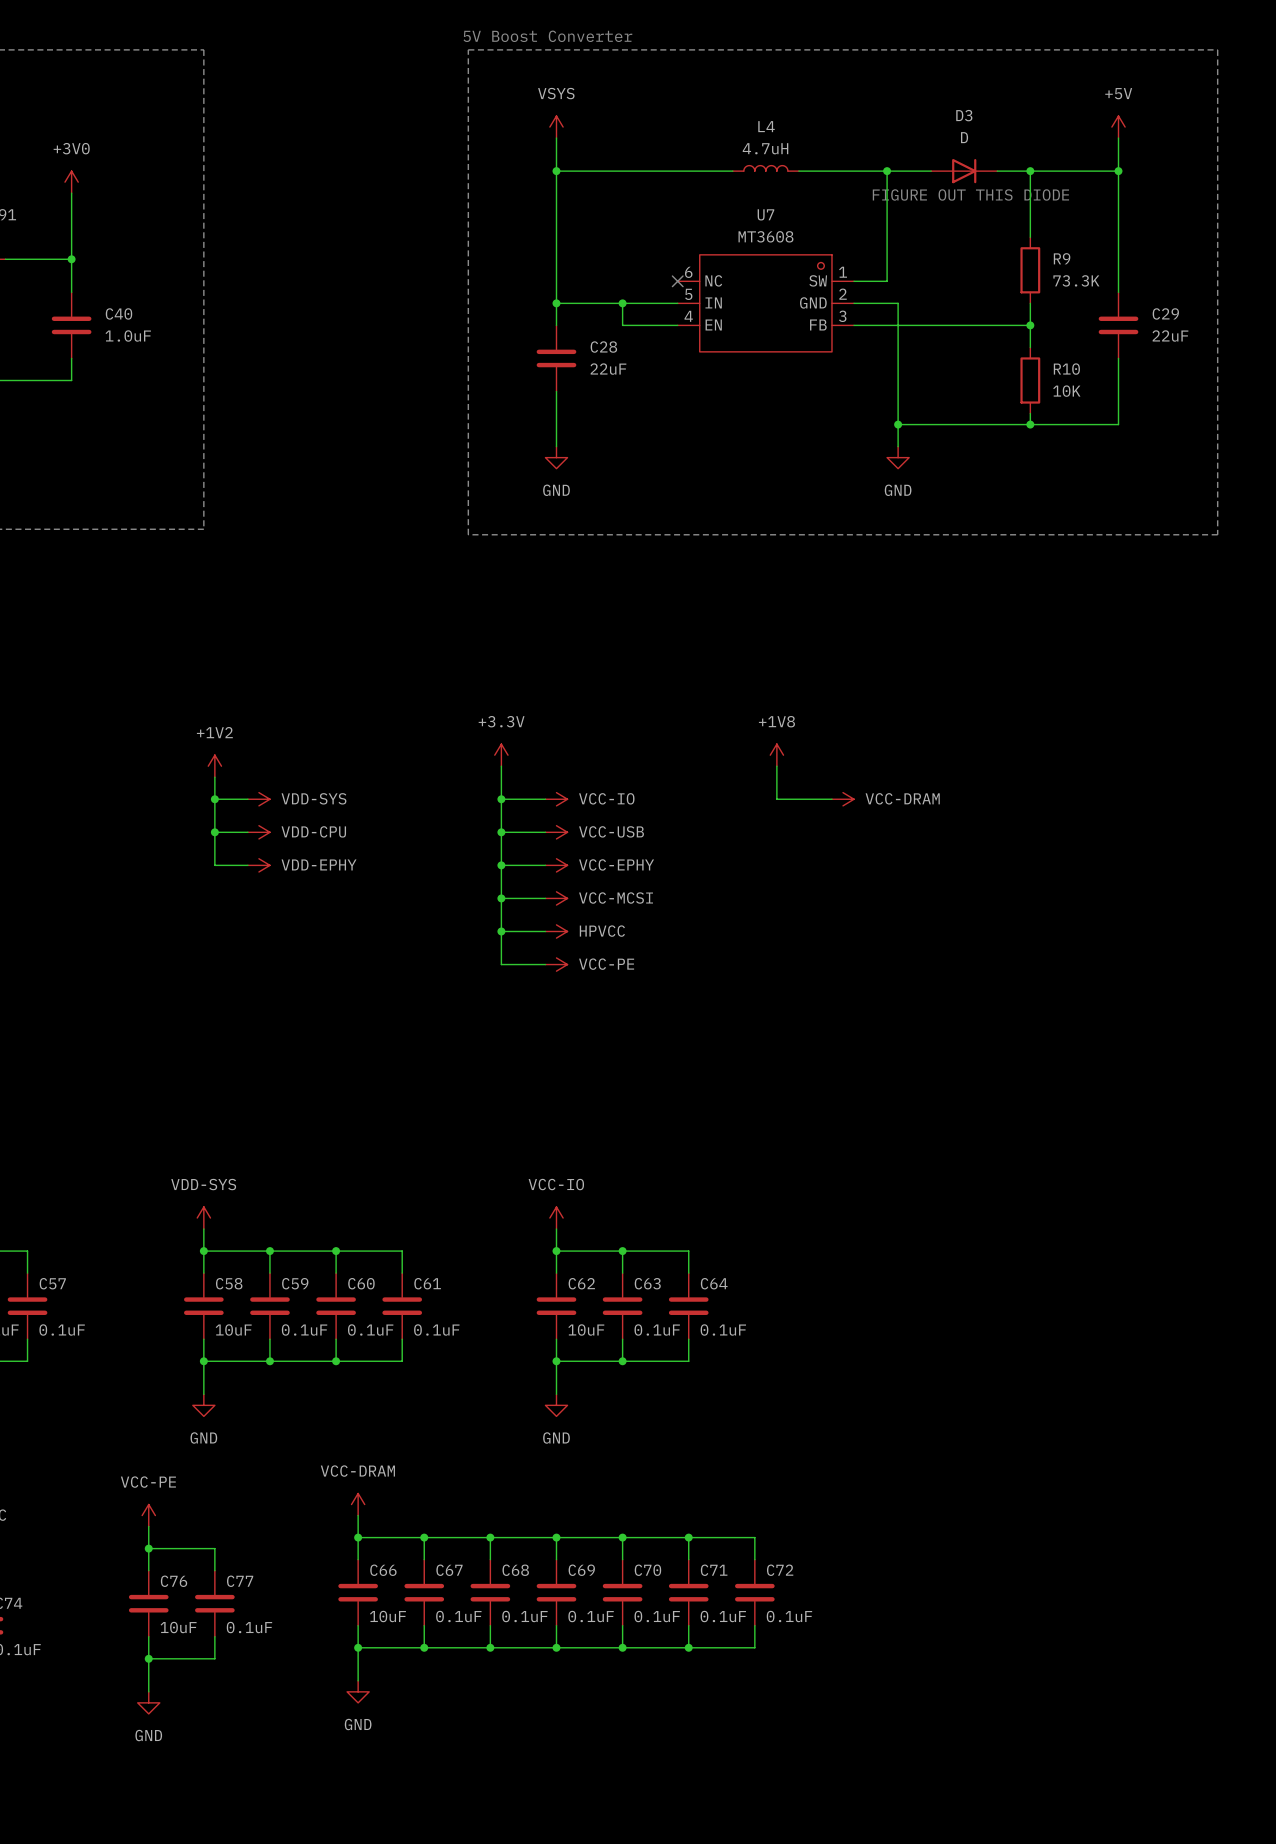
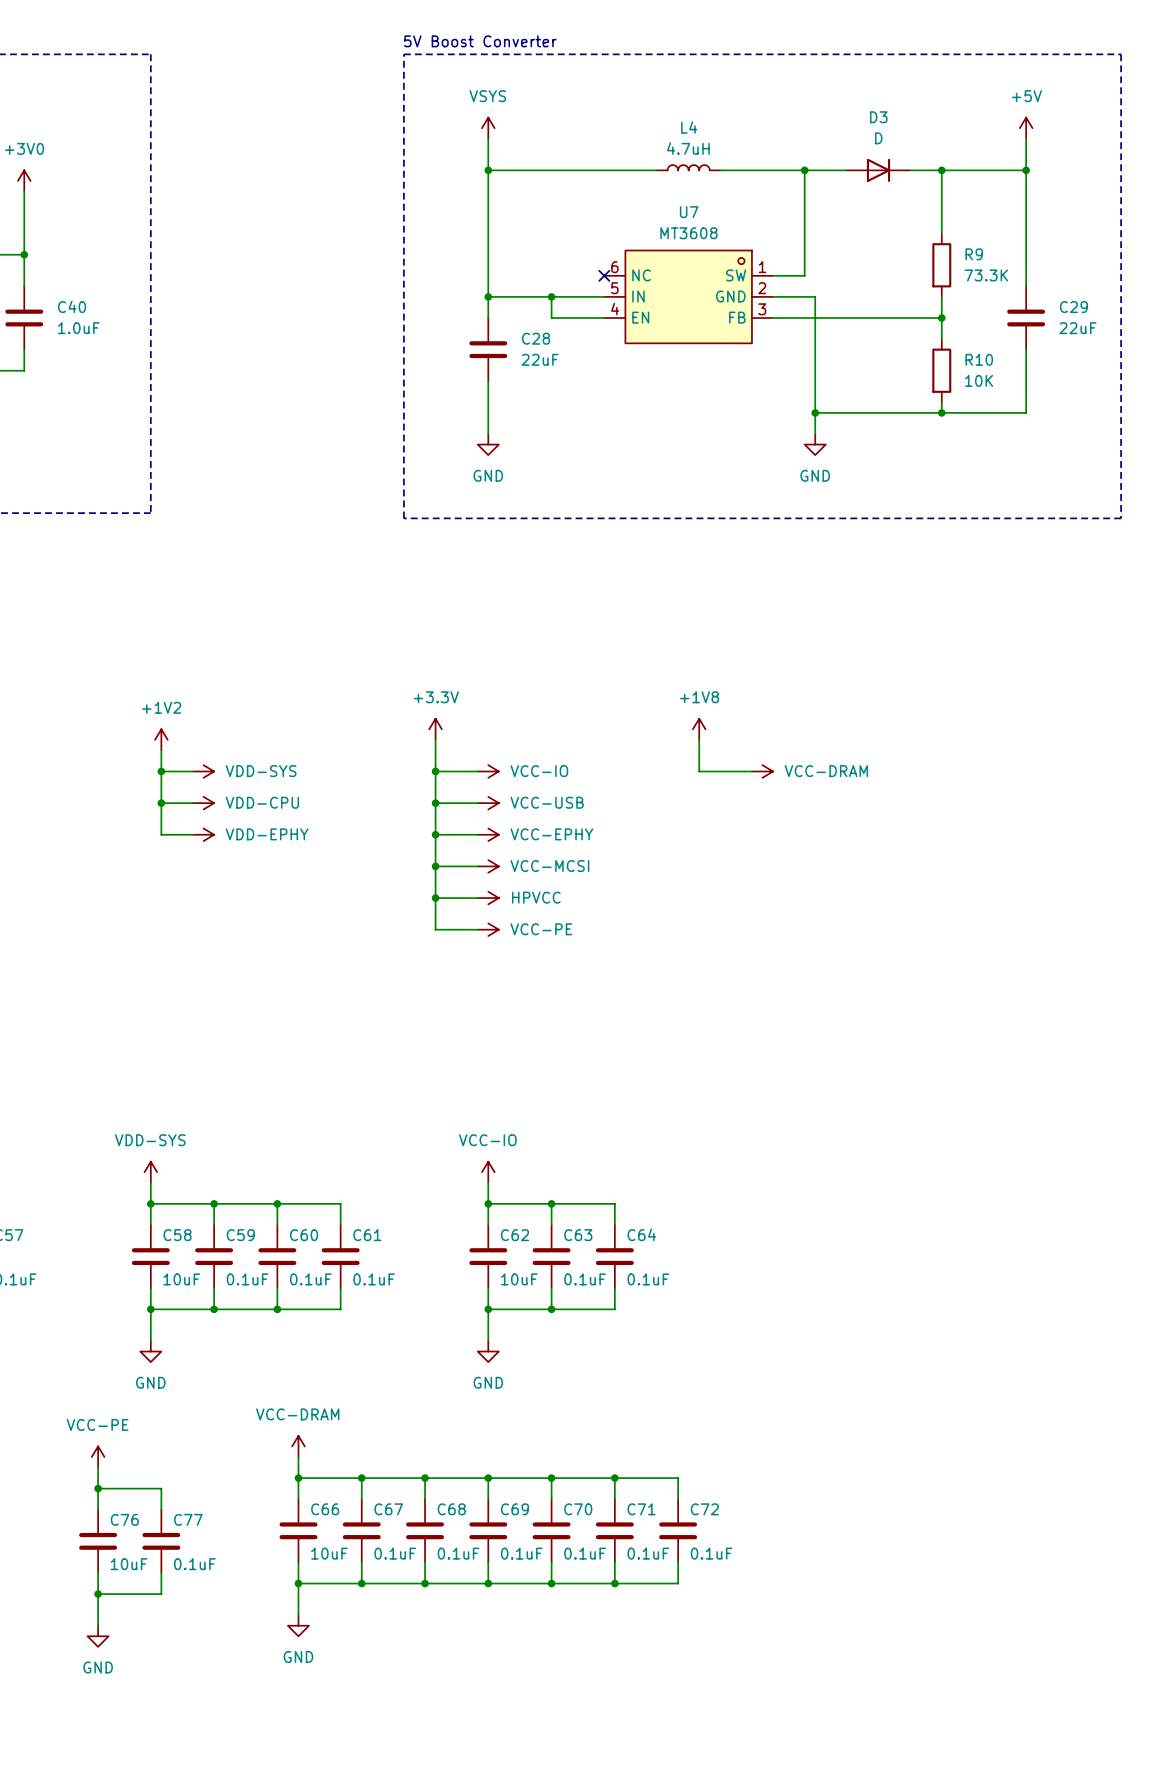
text: FIGURE OUT THIS DIODE (970, 194) -> none

